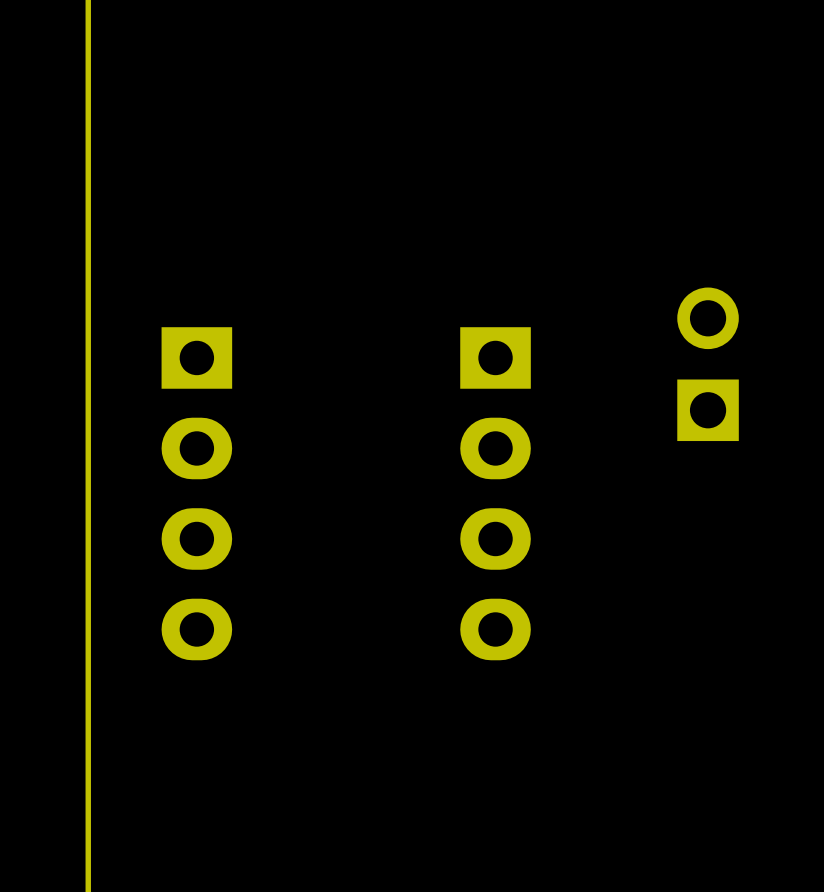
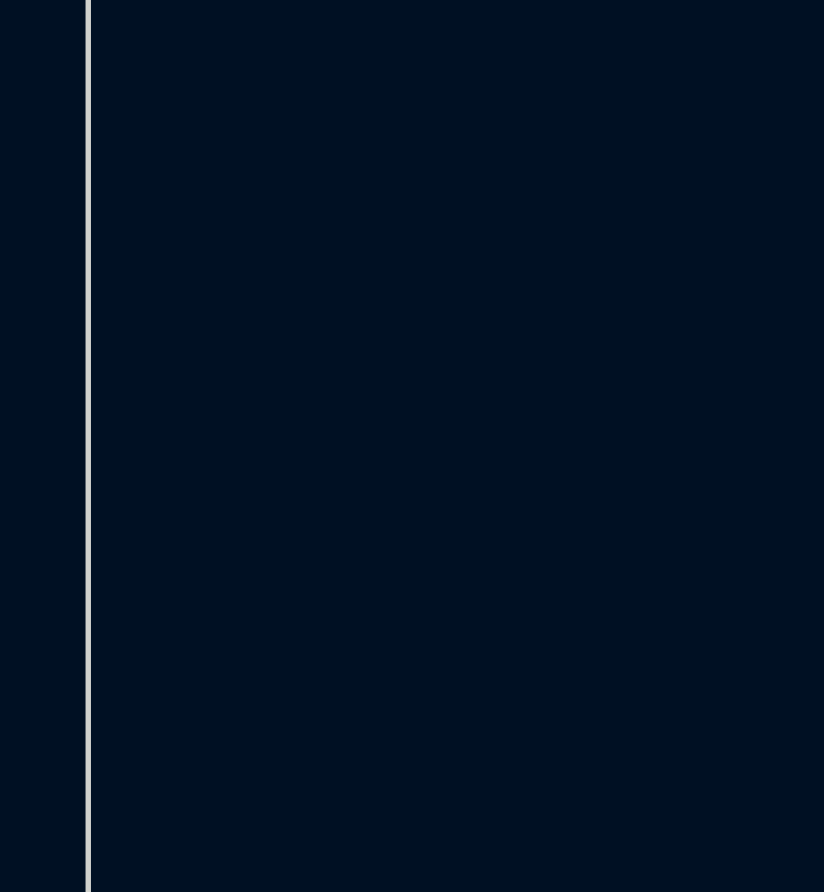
part: (708, 364) -> none
part: (196, 493) -> none
part: (495, 493) -> none

